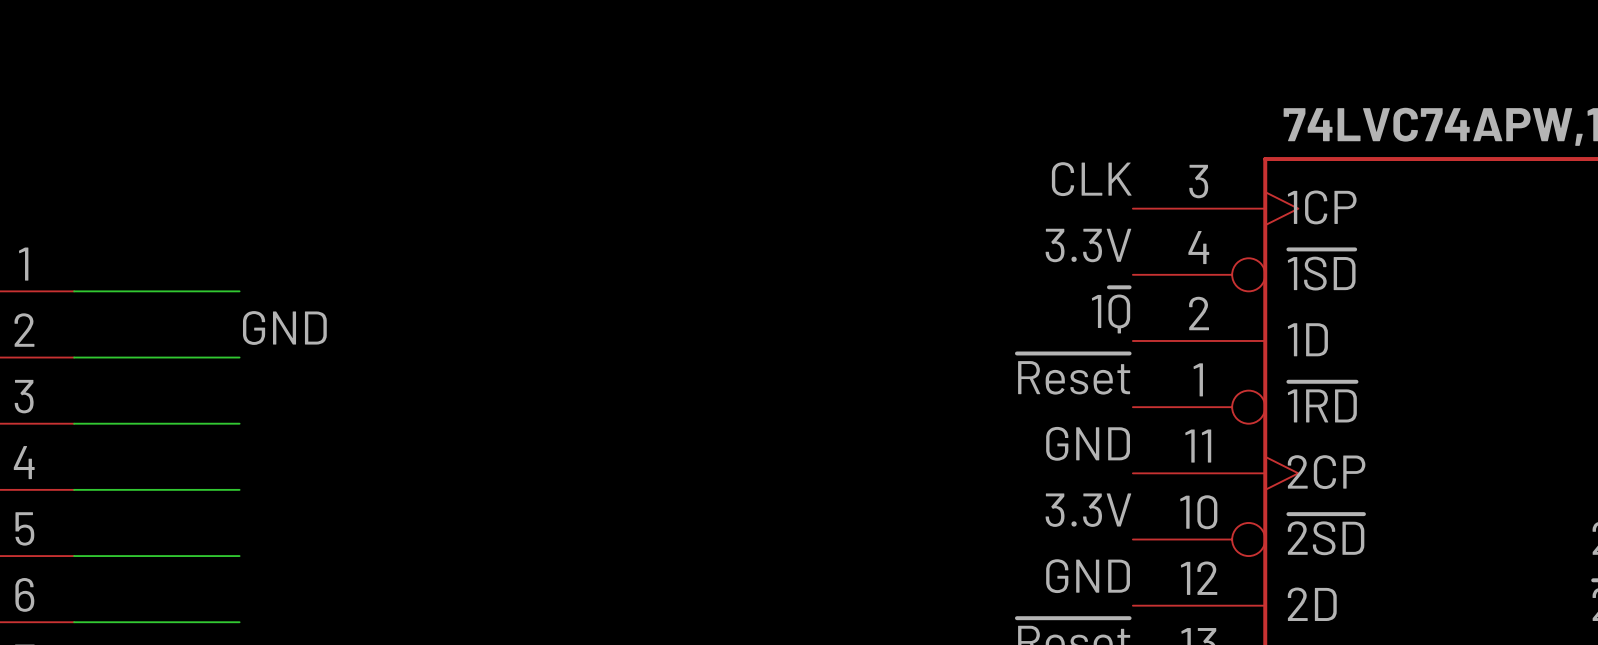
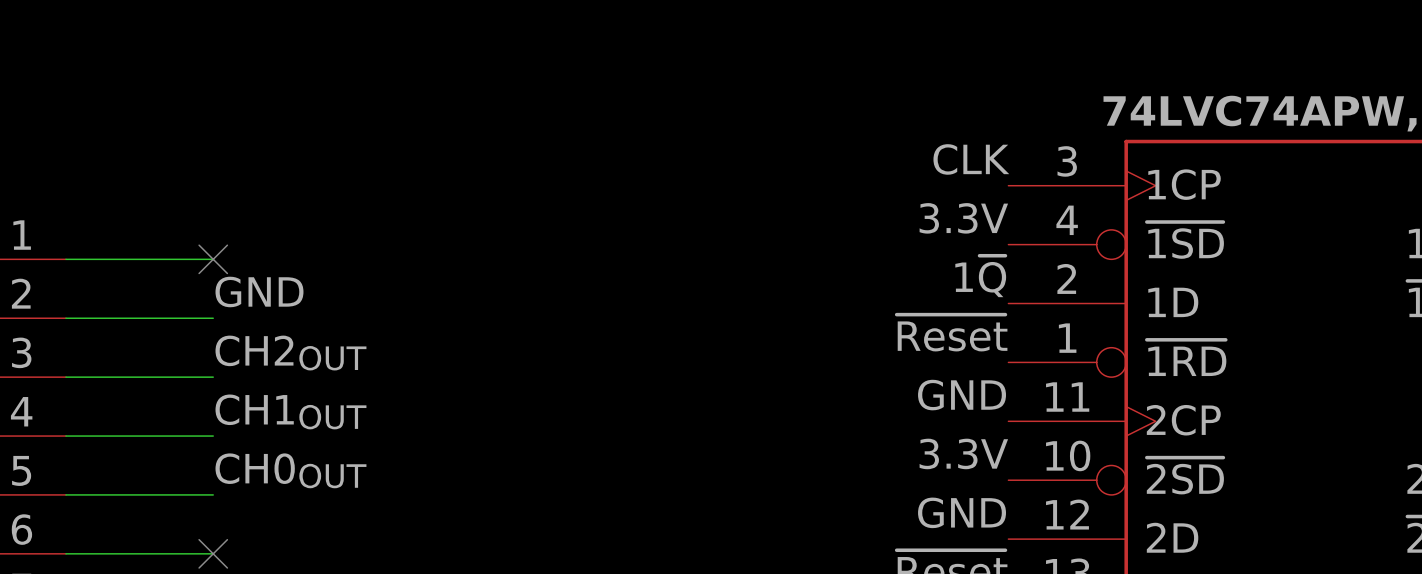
no-connect mark: none -> (213, 259)
label: none -> CH2OUT (290, 353)
label: none -> CH1OUT (290, 411)
label: none -> CH0OUT (290, 470)
no-connect mark: none -> (213, 553)

